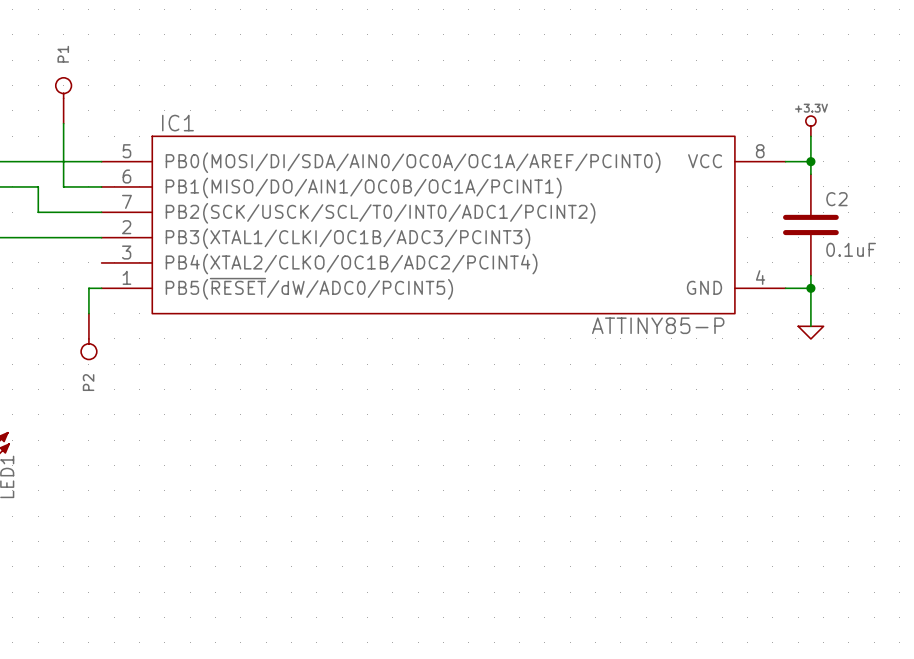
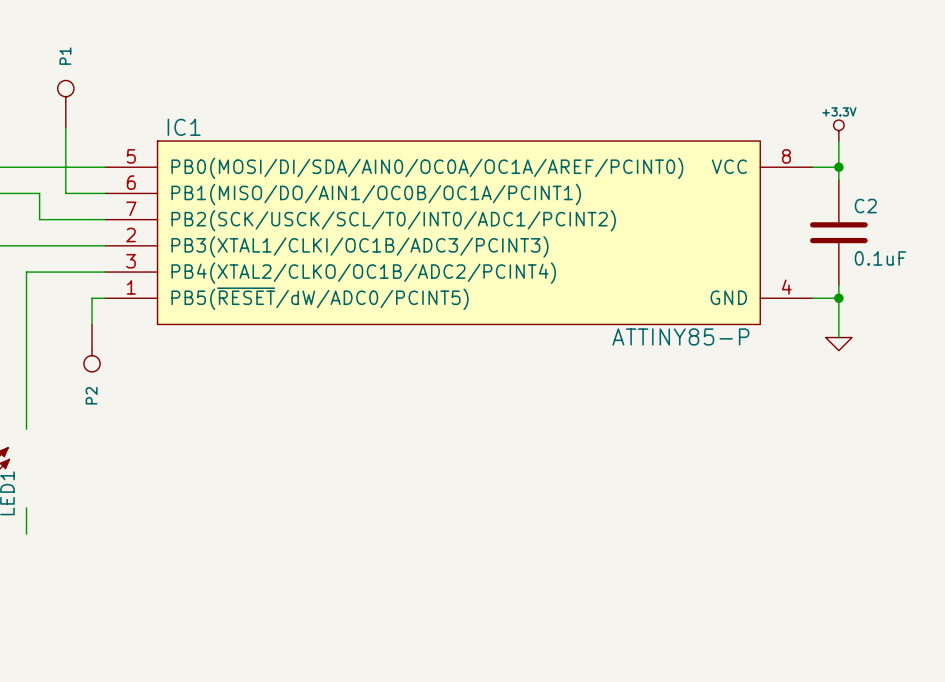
wire: none -> (105, 272) (26, 272) (26, 429)
wire: none -> (26, 507) (26, 534)

